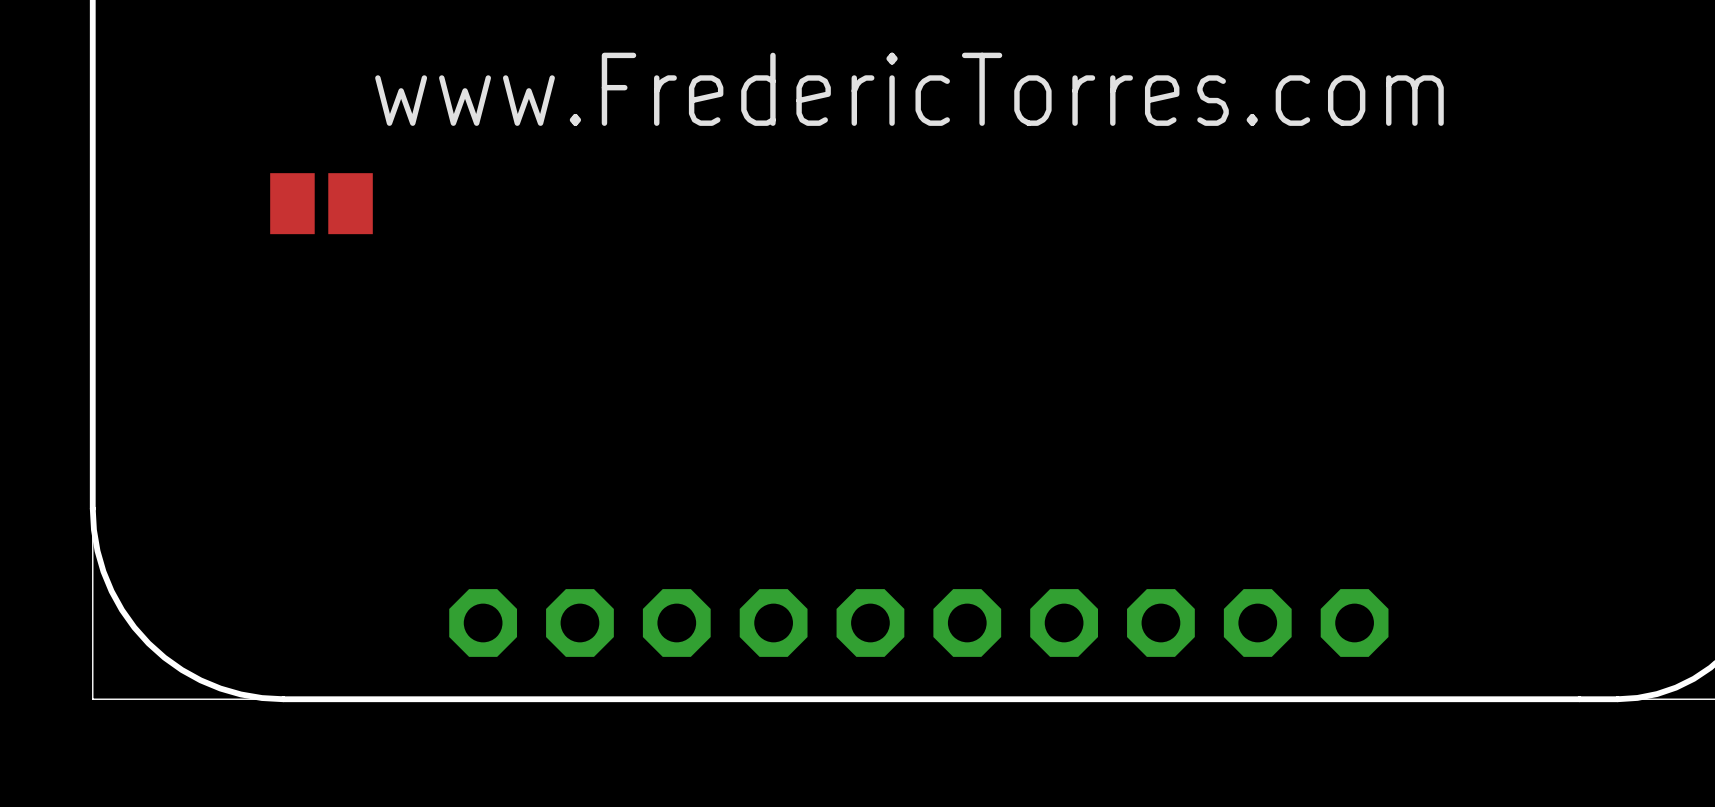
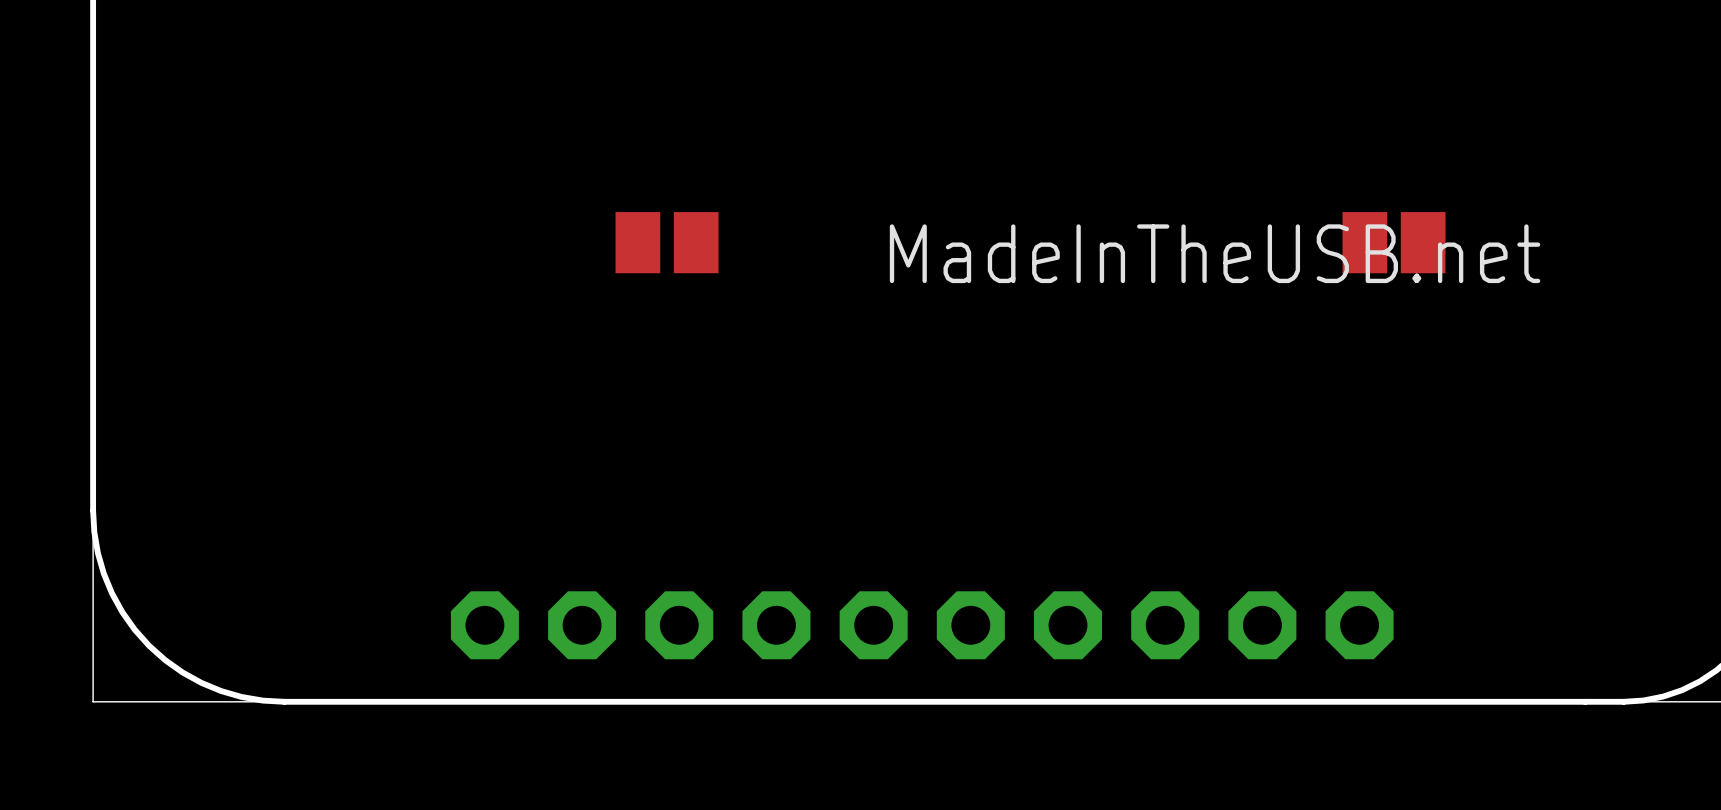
text: www.FredericTorres.com (909, 89) -> none
part: (321, 203) -> none
part: none -> (667, 242)
part: none -> (1394, 242)
text: none -> MadeInTheUSB.net (1215, 253)

